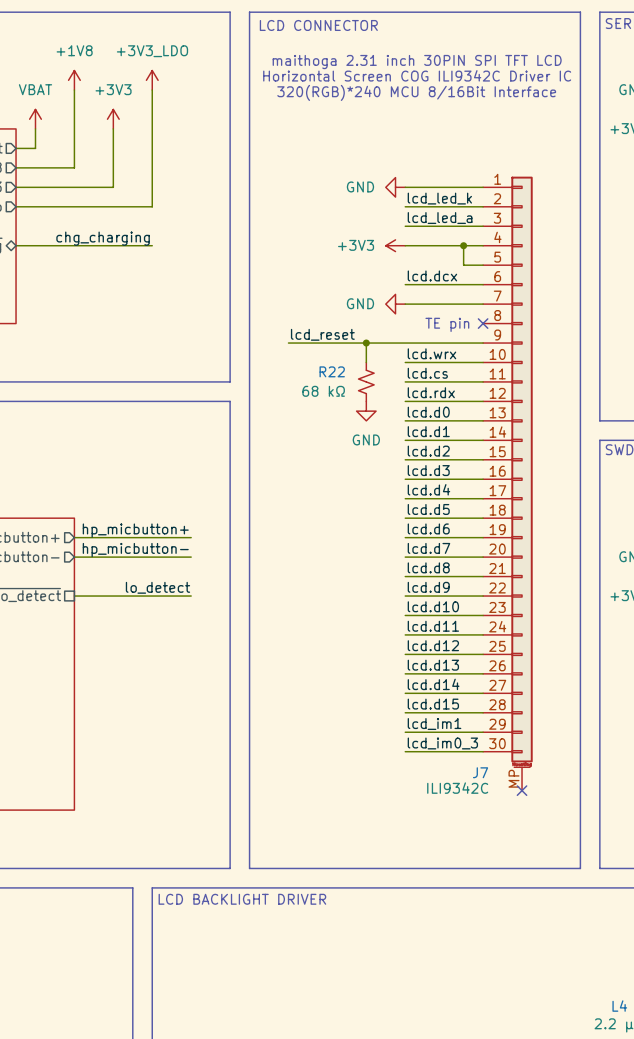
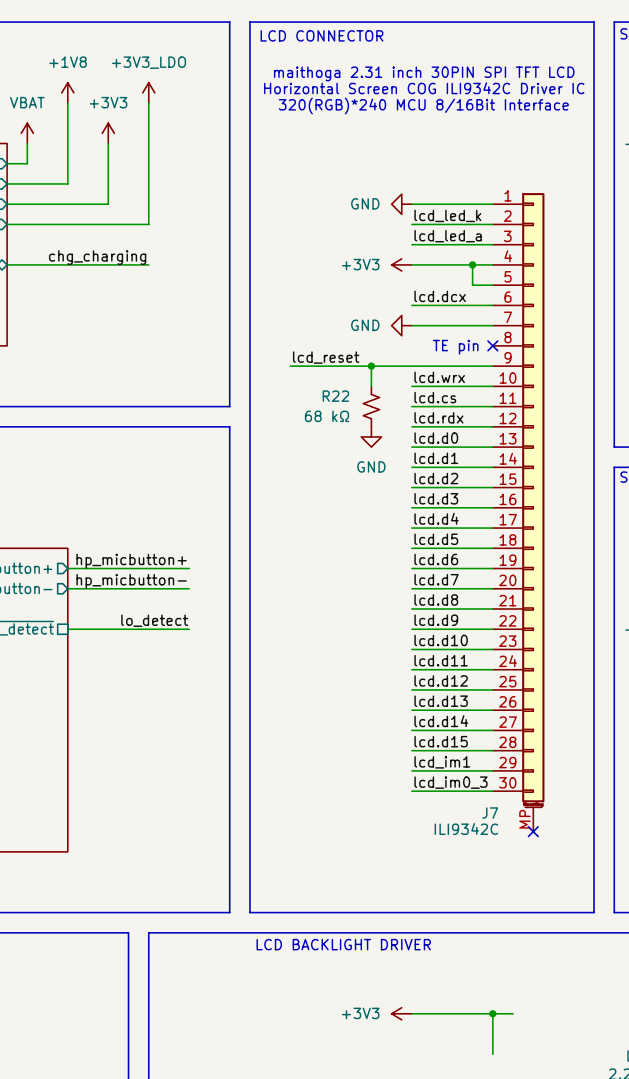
text position: LCD BACKLIGHT DRIVER (242, 899) -> LCD BACKLIGHT DRIVER (343, 944)
power symbol: none -> +3V3 (401, 1013)
wire: none -> (411, 1013) (513, 1013)
wire: none -> (492, 1013) (492, 1054)
junction: none -> (492, 1013)

